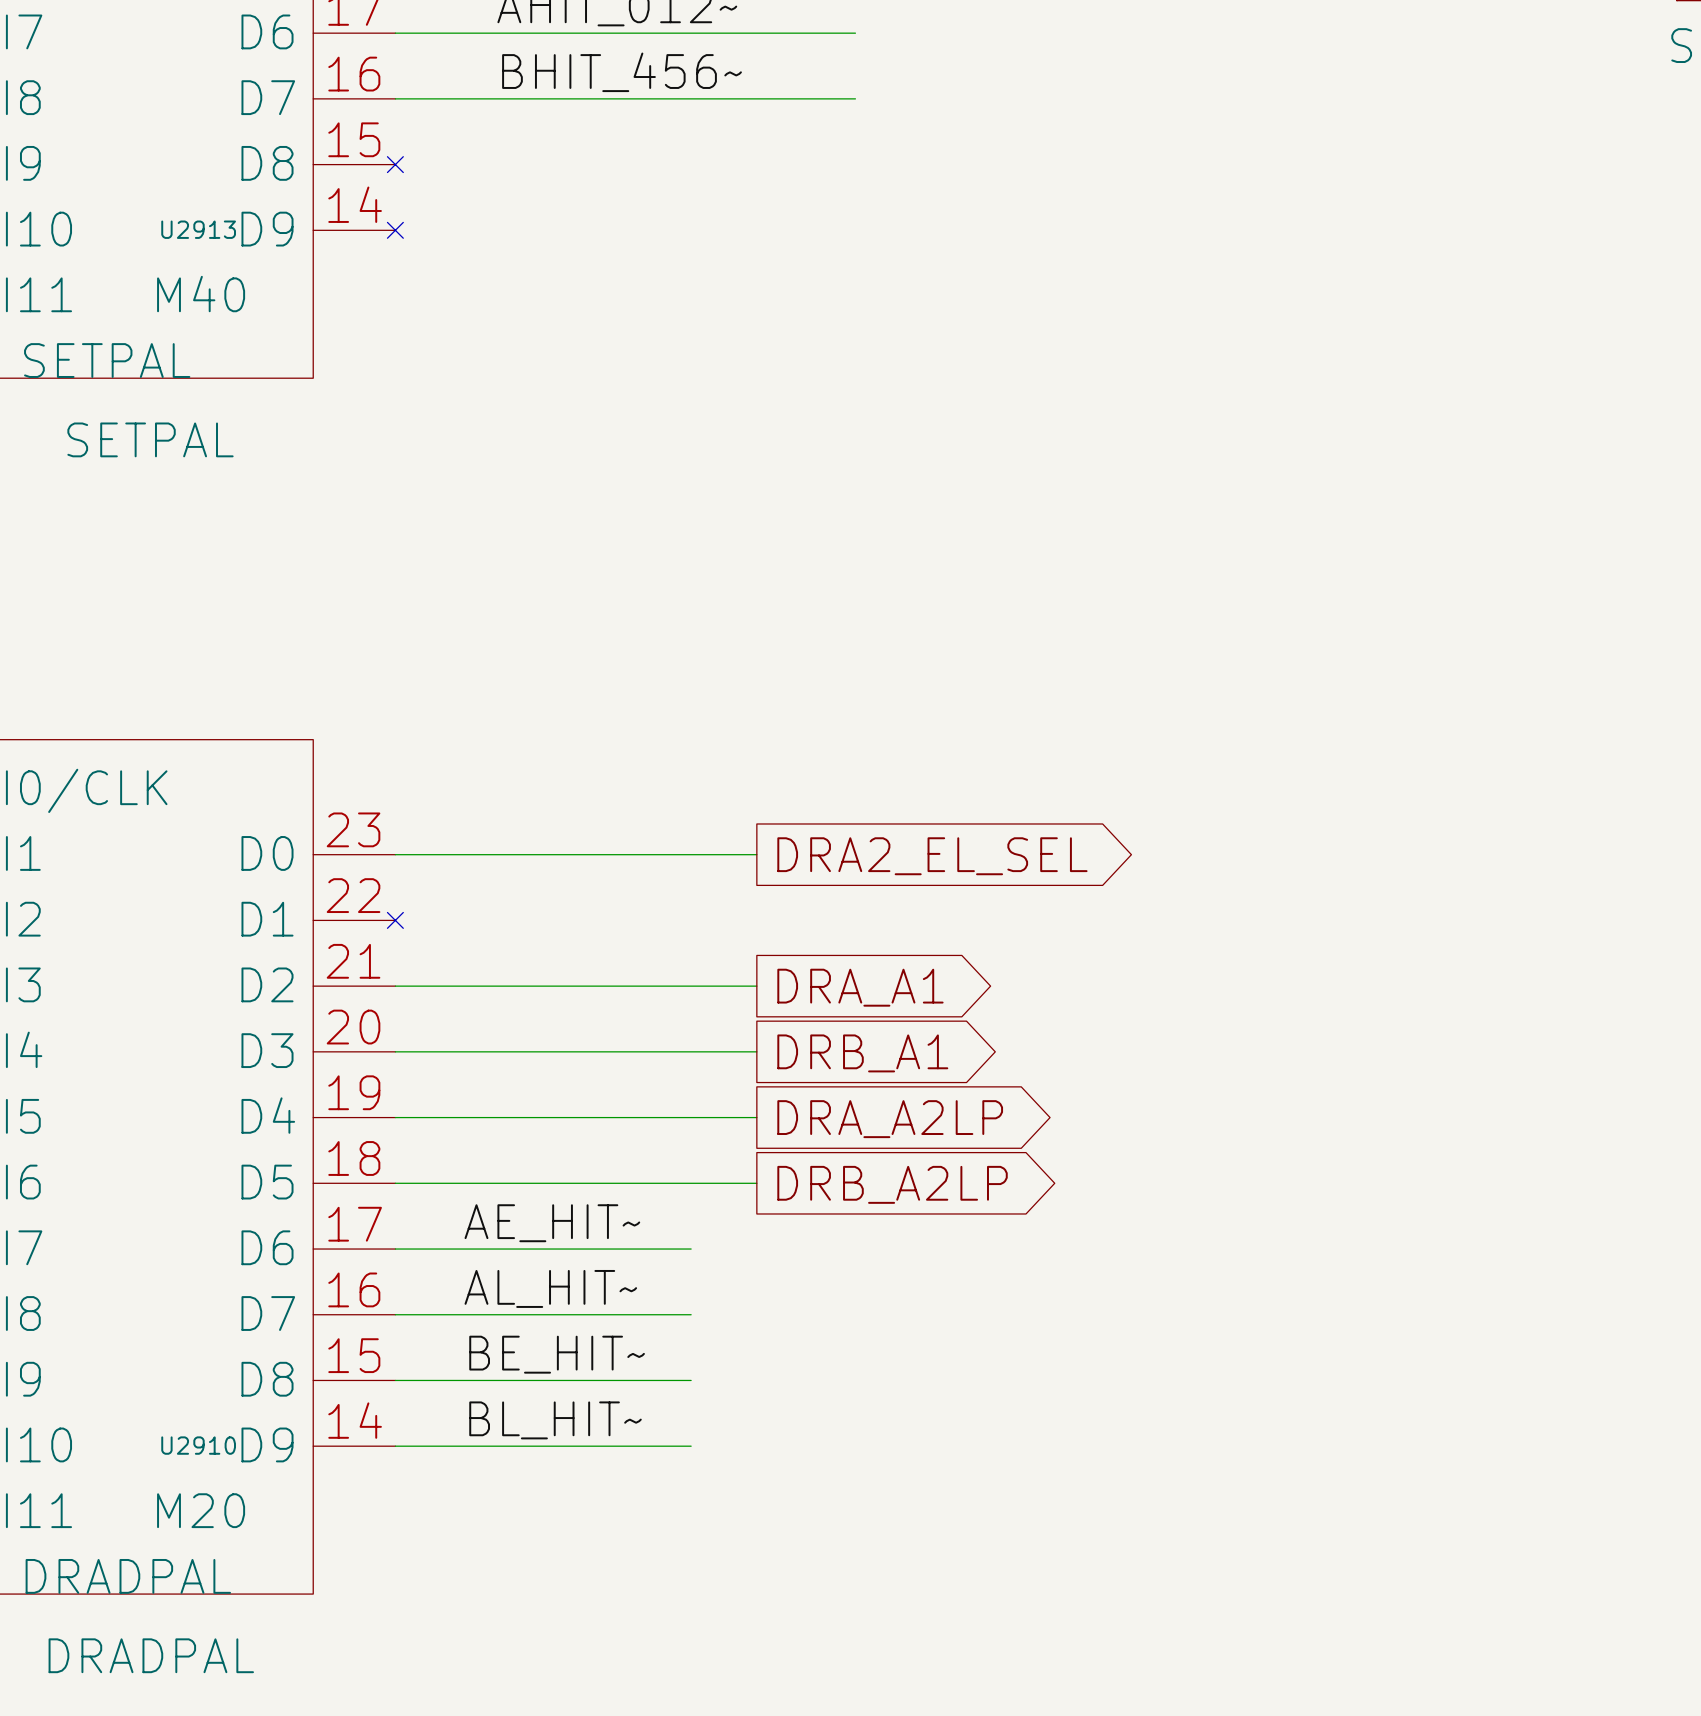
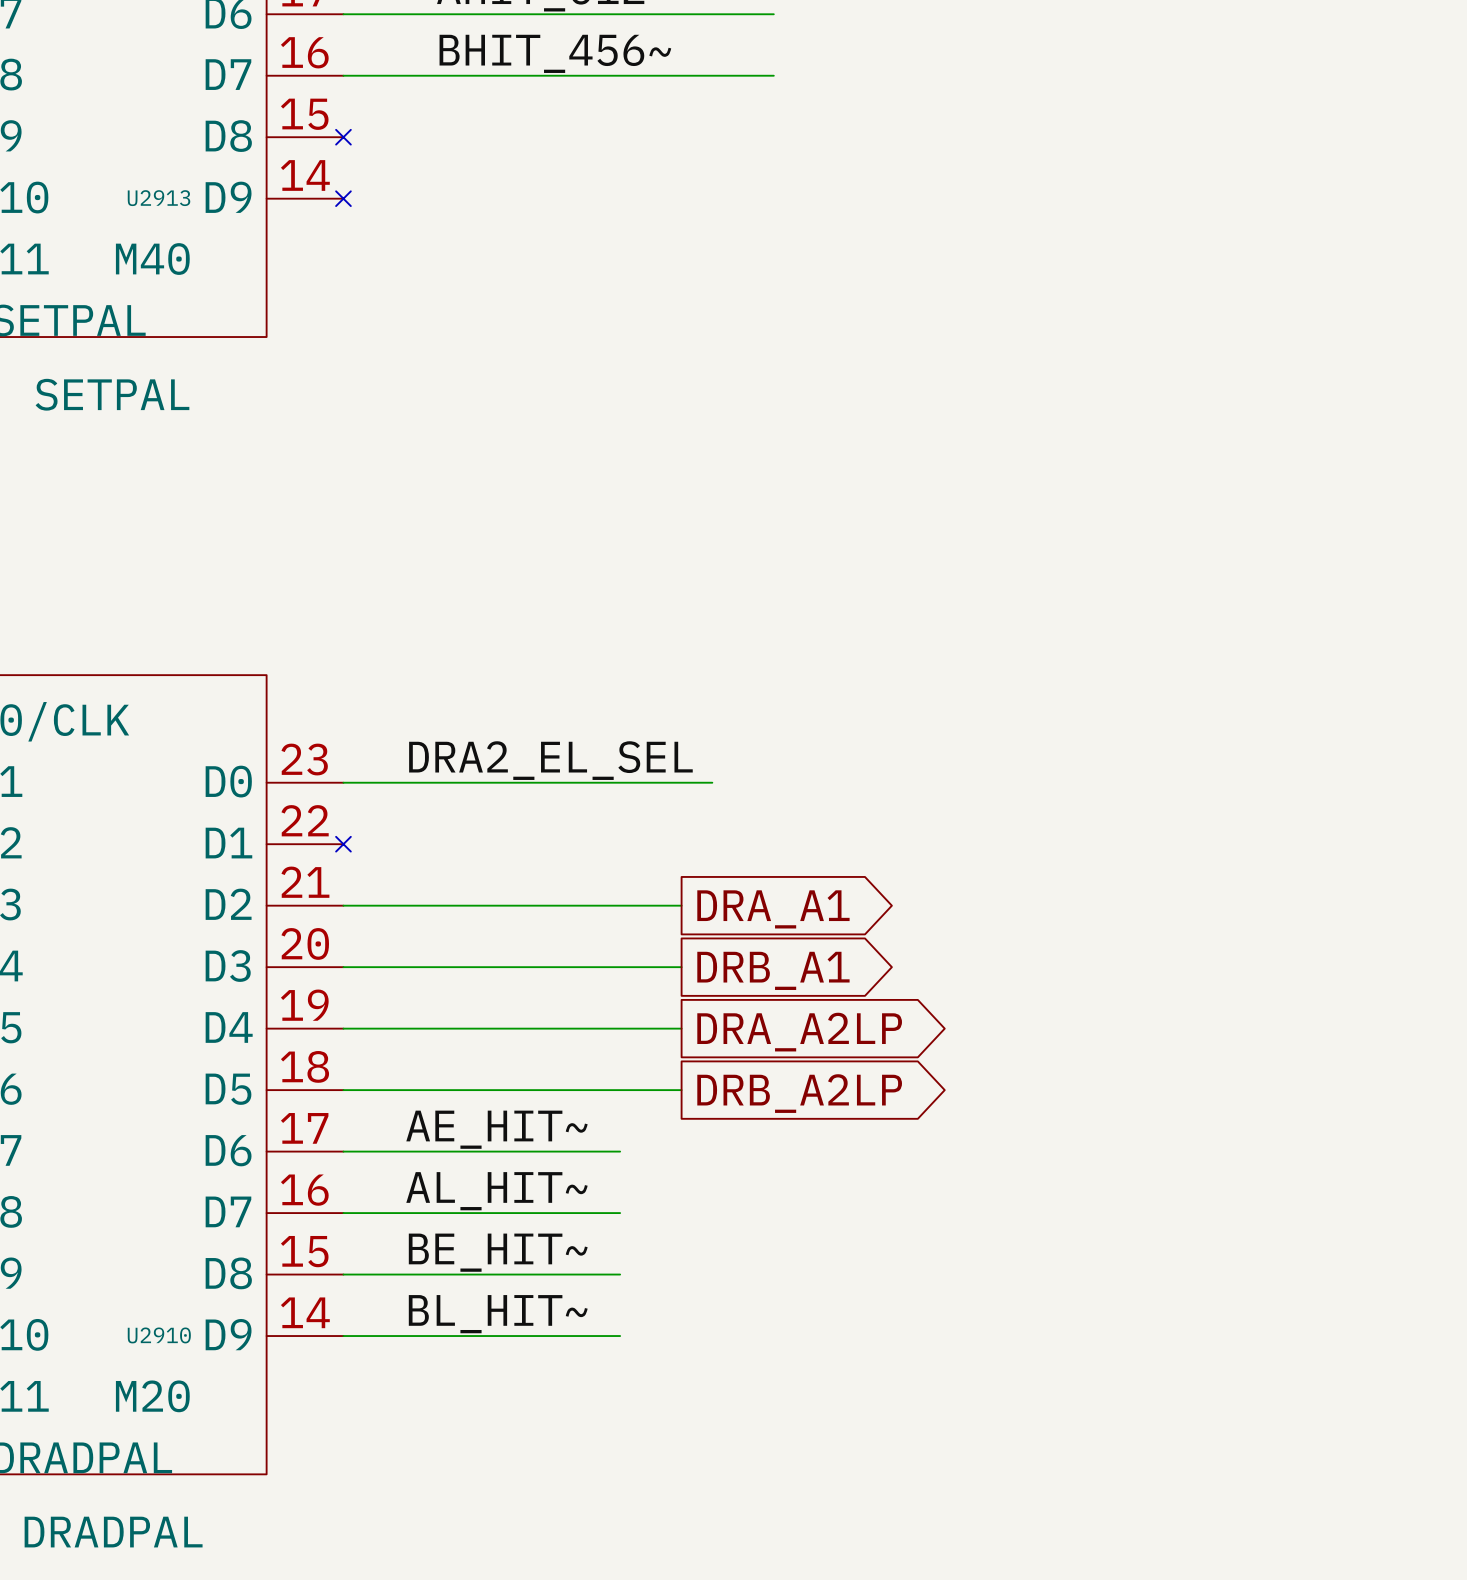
label: none -> DRA2_EL_SEL (550, 760)
wire: none -> (681, 782) (712, 782)
global label: DRA2_EL_SEL (932, 856) -> none

